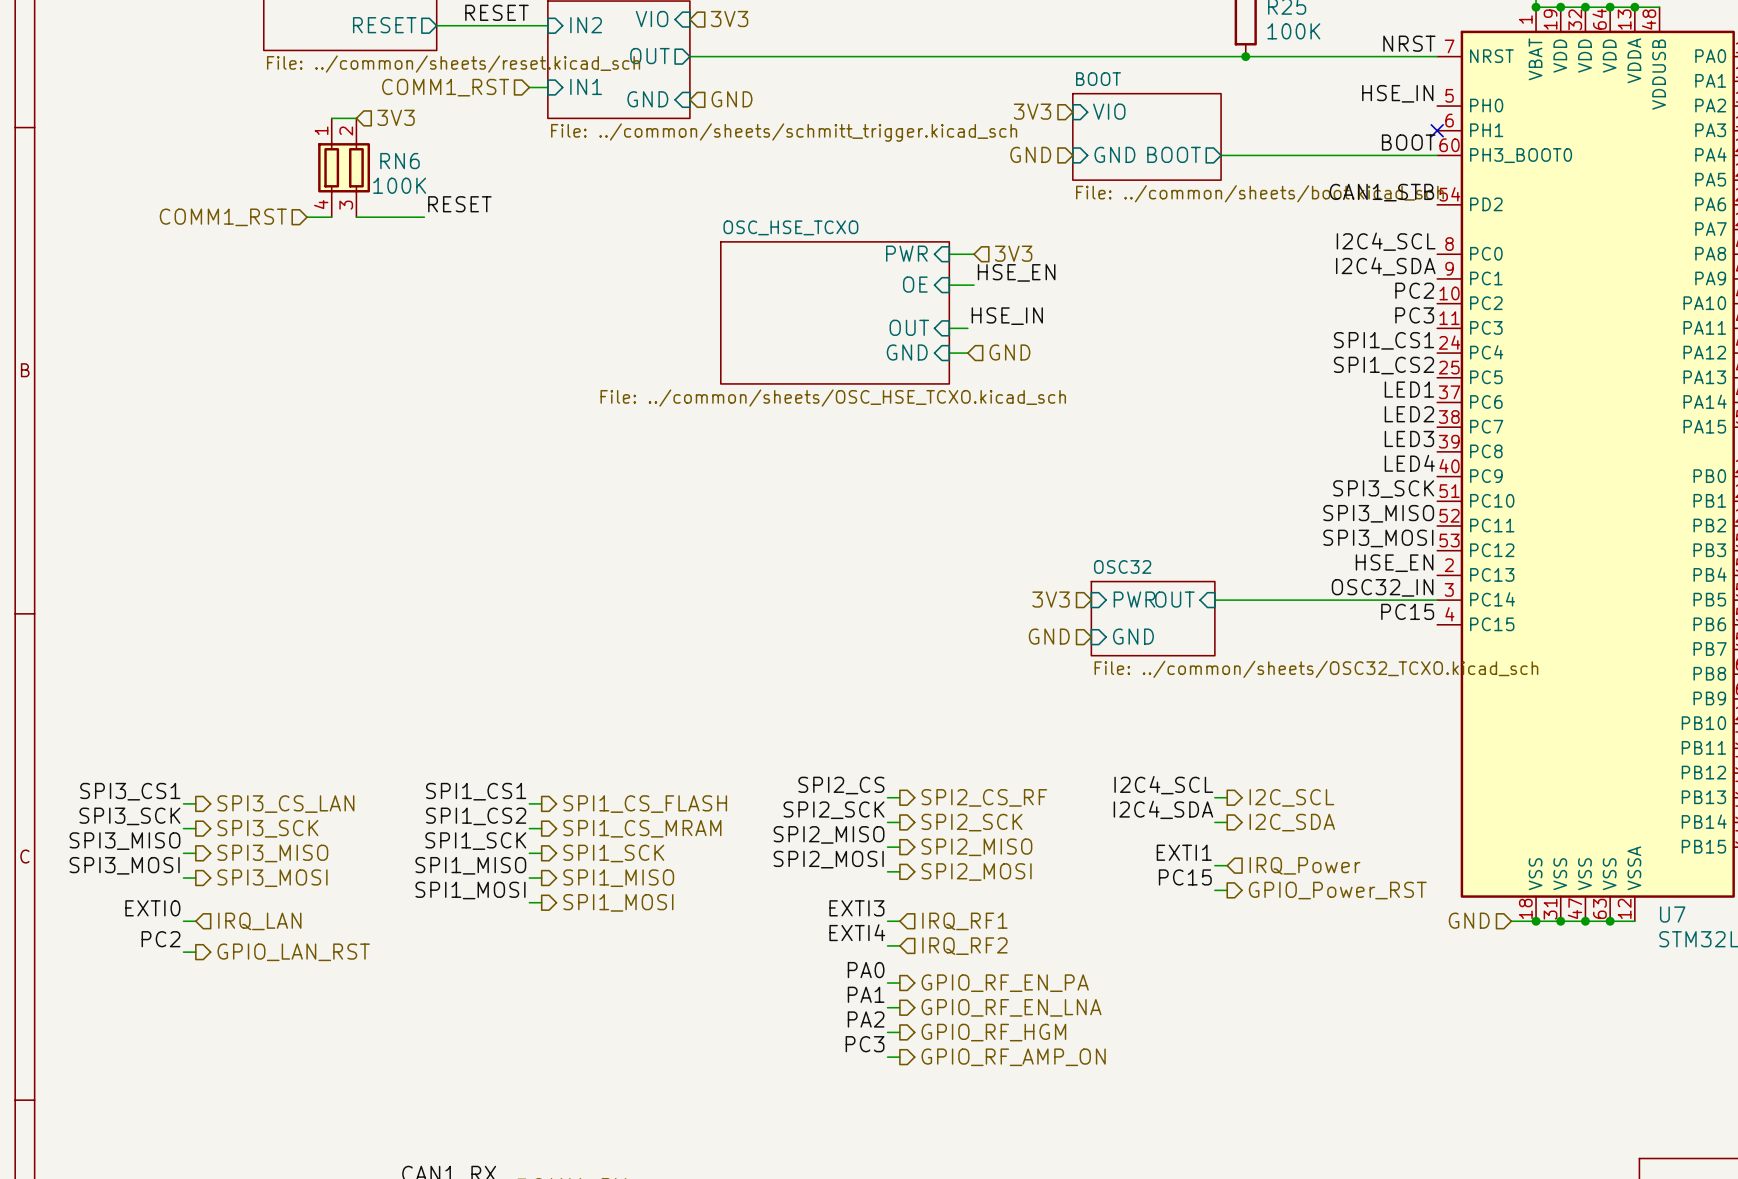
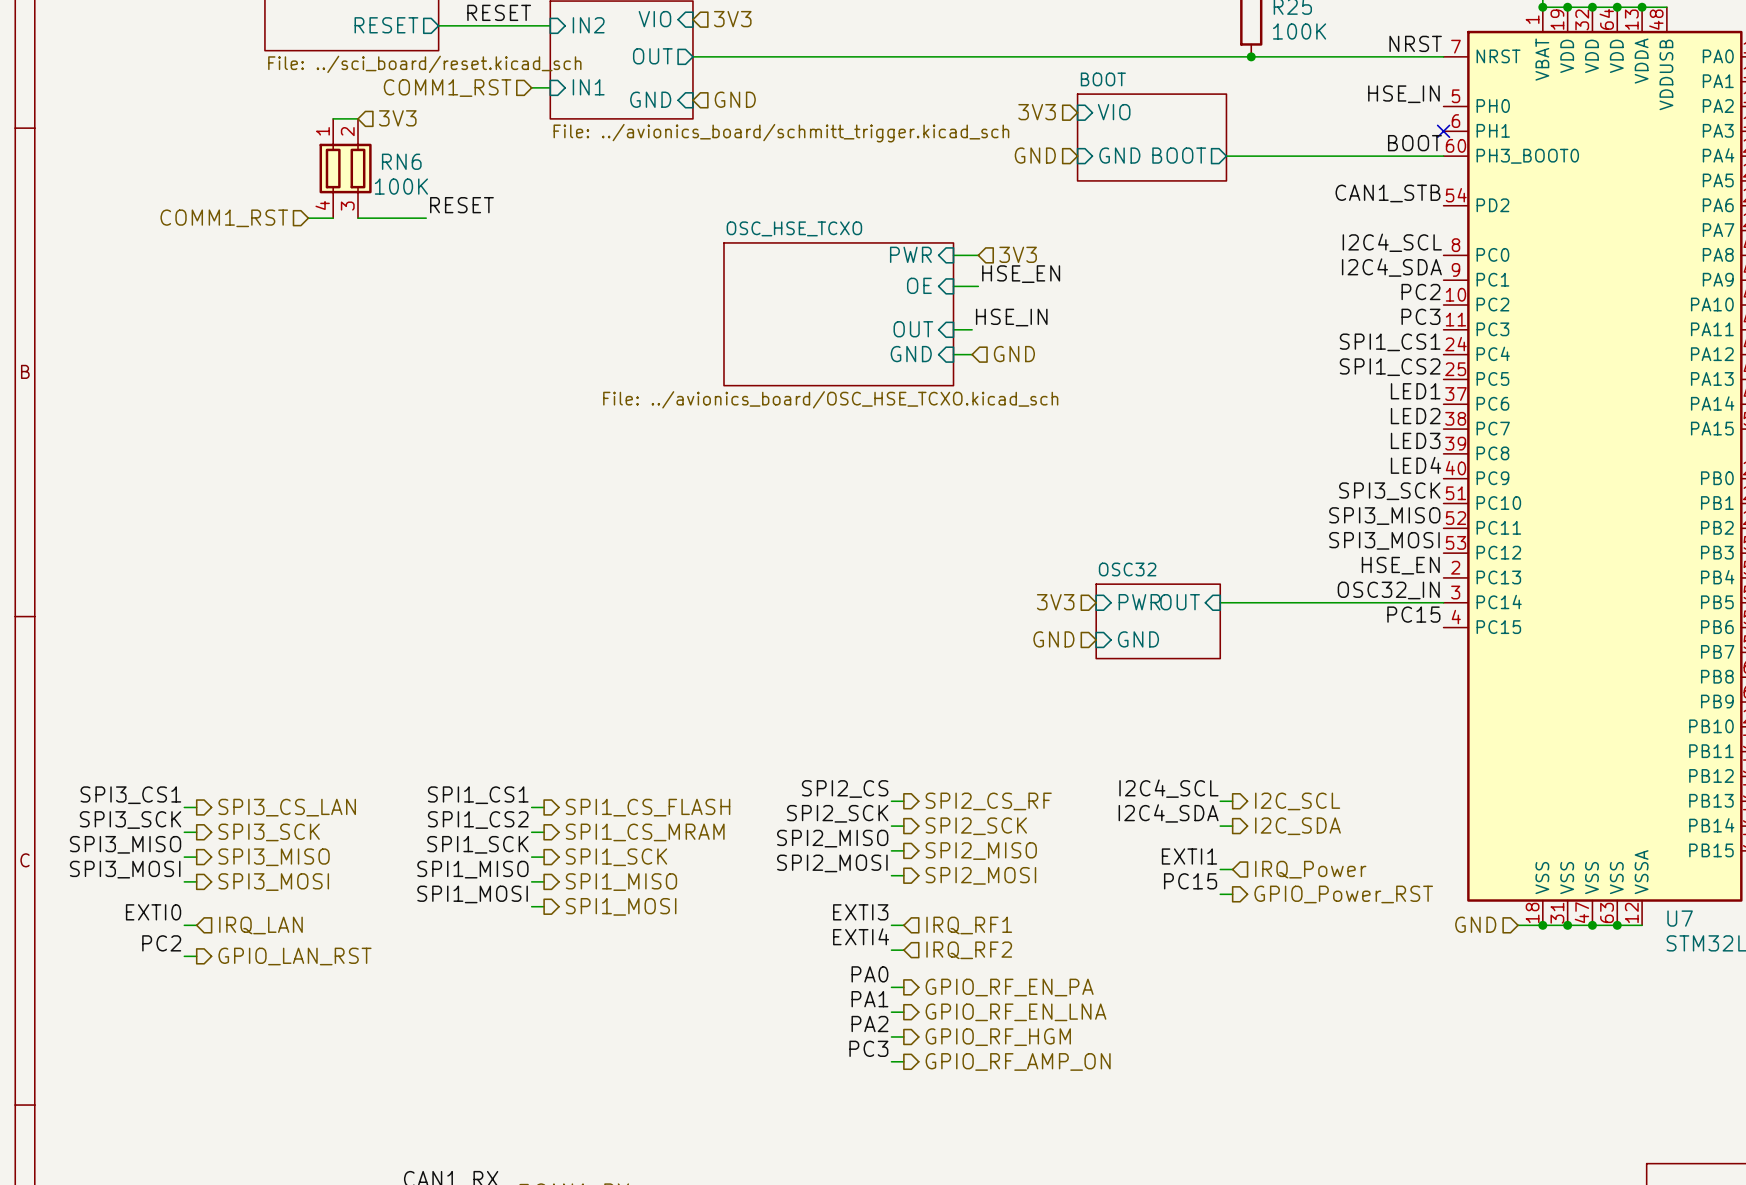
sheet value: File: ../common/sheets/reset.kicad_sch (453, 64) -> File: ../sci_board/reset.kicad_sch (424, 64)
sheet value: File: ../common/sheets/schmitt_trigger.kicad_sch (784, 132) -> File: ../avionics_board/schmitt_trigger.kicad_sch (781, 133)
sheet BOOT value: File: ../common/sheets/boot.kicad_sch (1259, 193) -> none
sheet OSC_HSE_TCXO value: File: ../common/sheets/OSC_HSE_TCXO.kicad_sch (833, 398) -> File: ../avionics_board/OSC_HSE_TCXO.kicad_sch (830, 399)
sheet OSC32 value: File: ../common/sheets/OSC32_TCXO.kicad_sch (1316, 669) -> none

